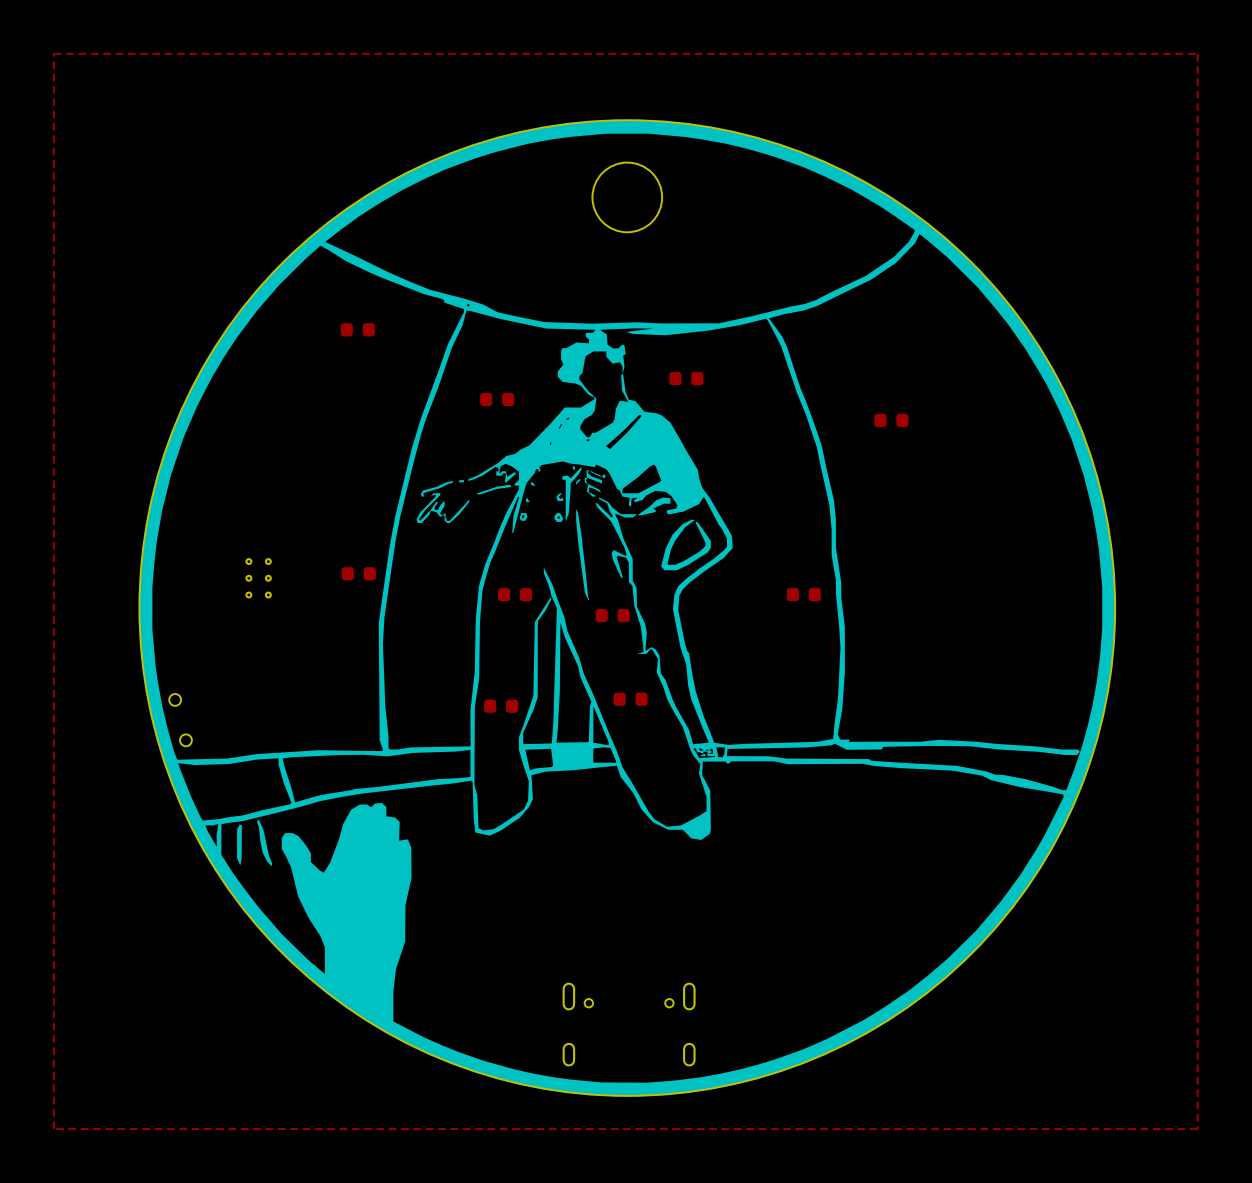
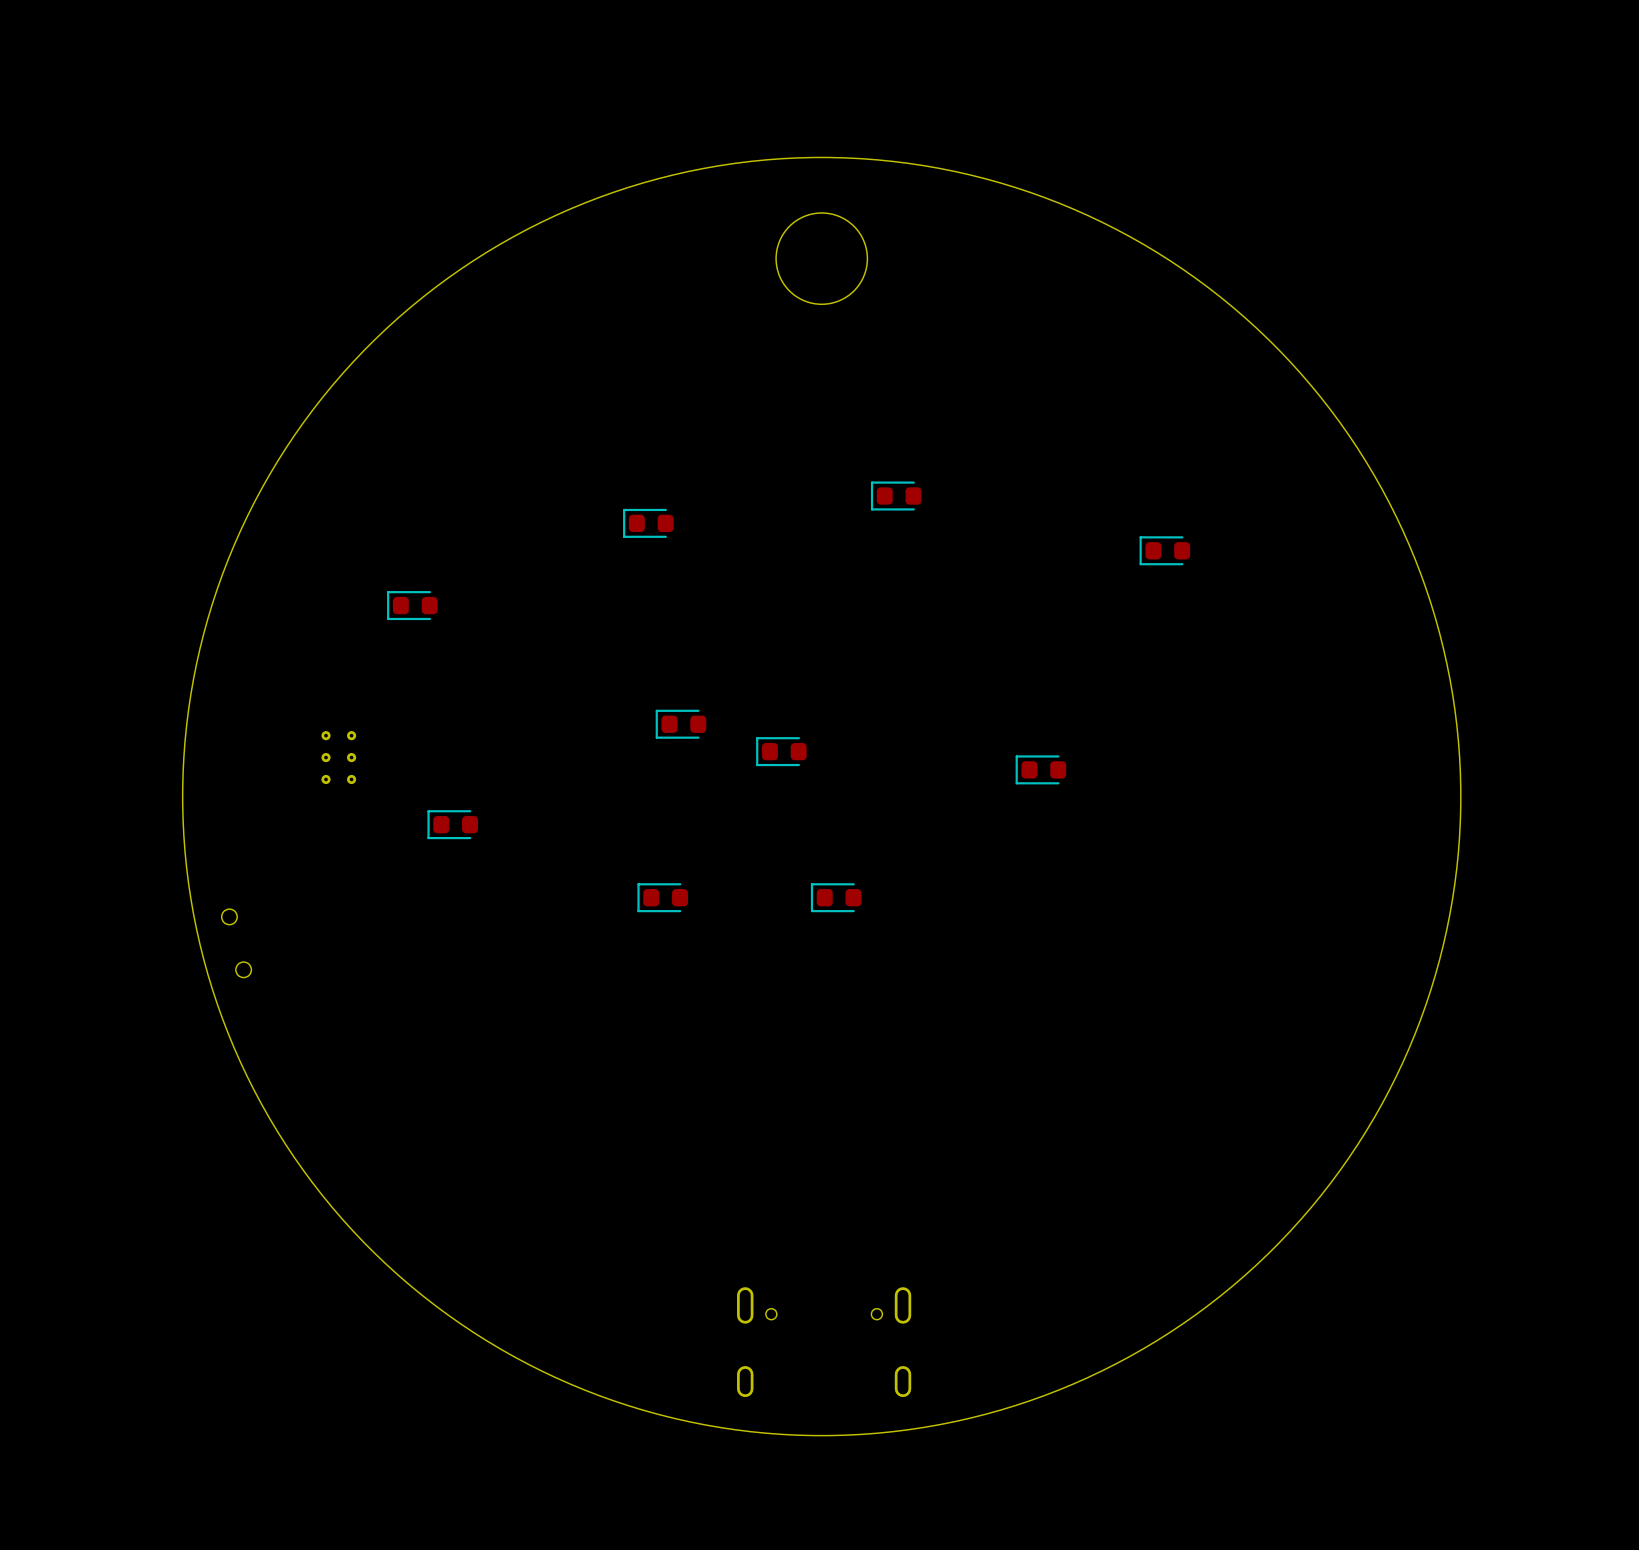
zone outline: (53, 53) (1197, 53) (1197, 1129) (53, 1129) (53, 53) -> none
drawing: [139, 120, 1116, 1096] -> none
part: (357, 329) -> none
part footprint: [669, 372, 704, 386] -> [870, 481, 922, 511]
part footprint: [480, 392, 515, 407] -> [623, 508, 674, 538]
part footprint: [874, 413, 909, 428] -> [1139, 536, 1191, 566]
part: none -> (412, 605)
part: none -> (680, 724)
part: (358, 573) -> none
part: none -> (781, 751)
part footprint: [786, 588, 821, 602] -> [1015, 755, 1067, 785]
part: (515, 594) -> none
part: (612, 615) -> none
part: none -> (452, 824)
part: none -> (662, 897)
part: none -> (836, 897)
part: (630, 699) -> none
part: (501, 706) -> none

